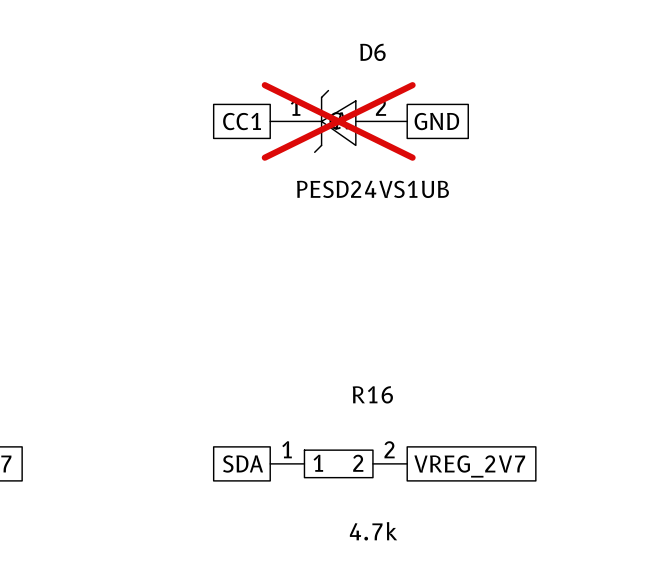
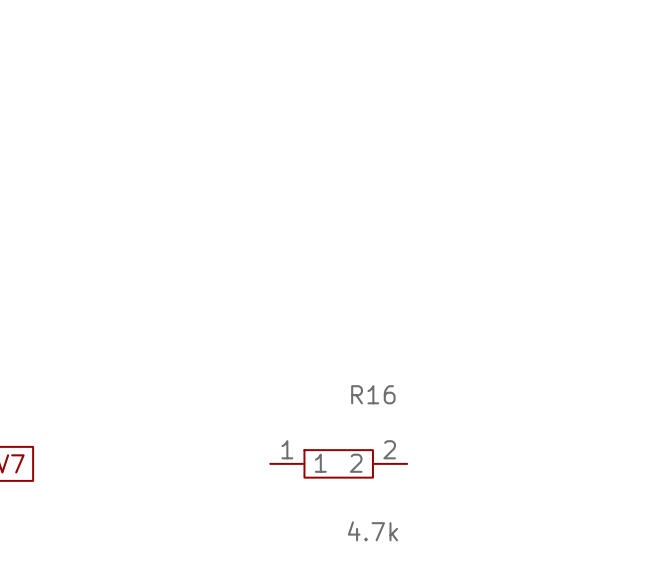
global label: CC1 (242, 121) -> none
D6: PESD24VS1UB (338, 121) -> none
global label: GND (436, 121) -> none
global label: SDA (243, 463) -> none
global label: VREG_2V7 (469, 466) -> none

